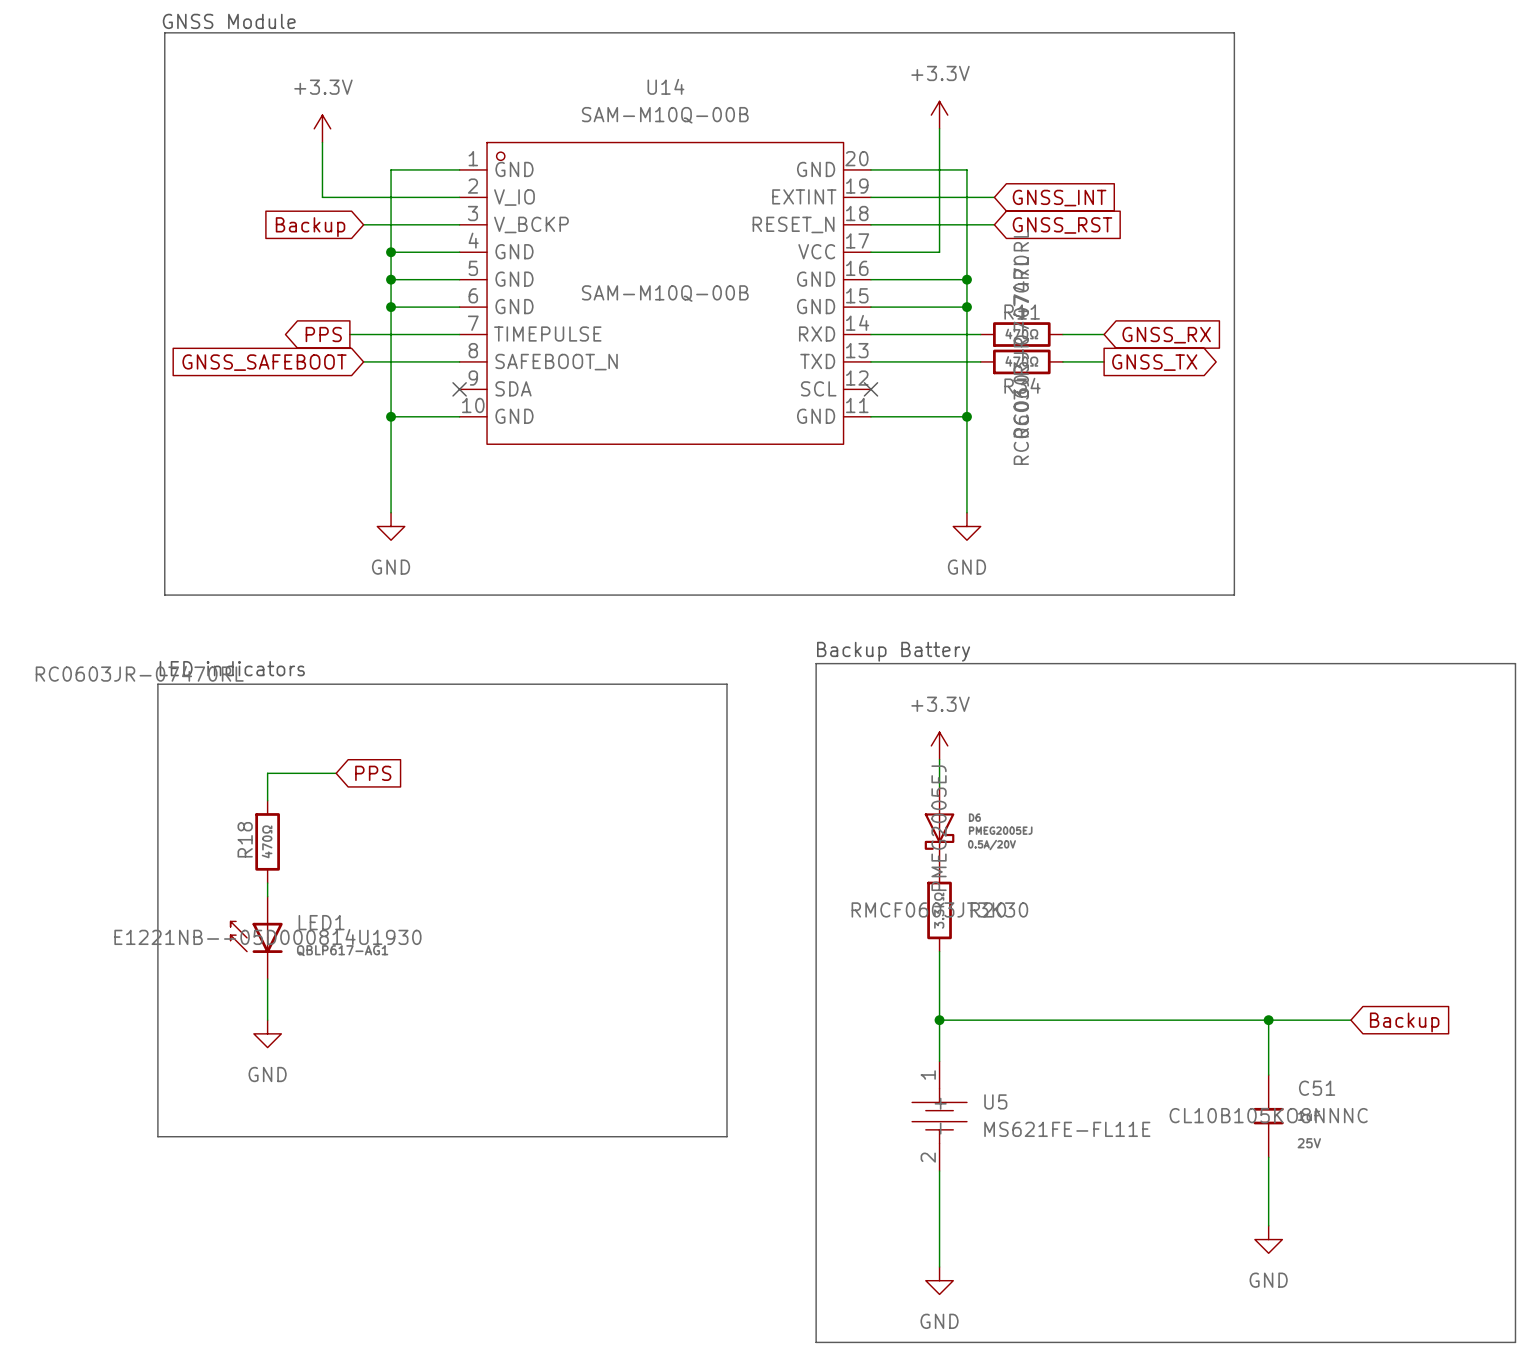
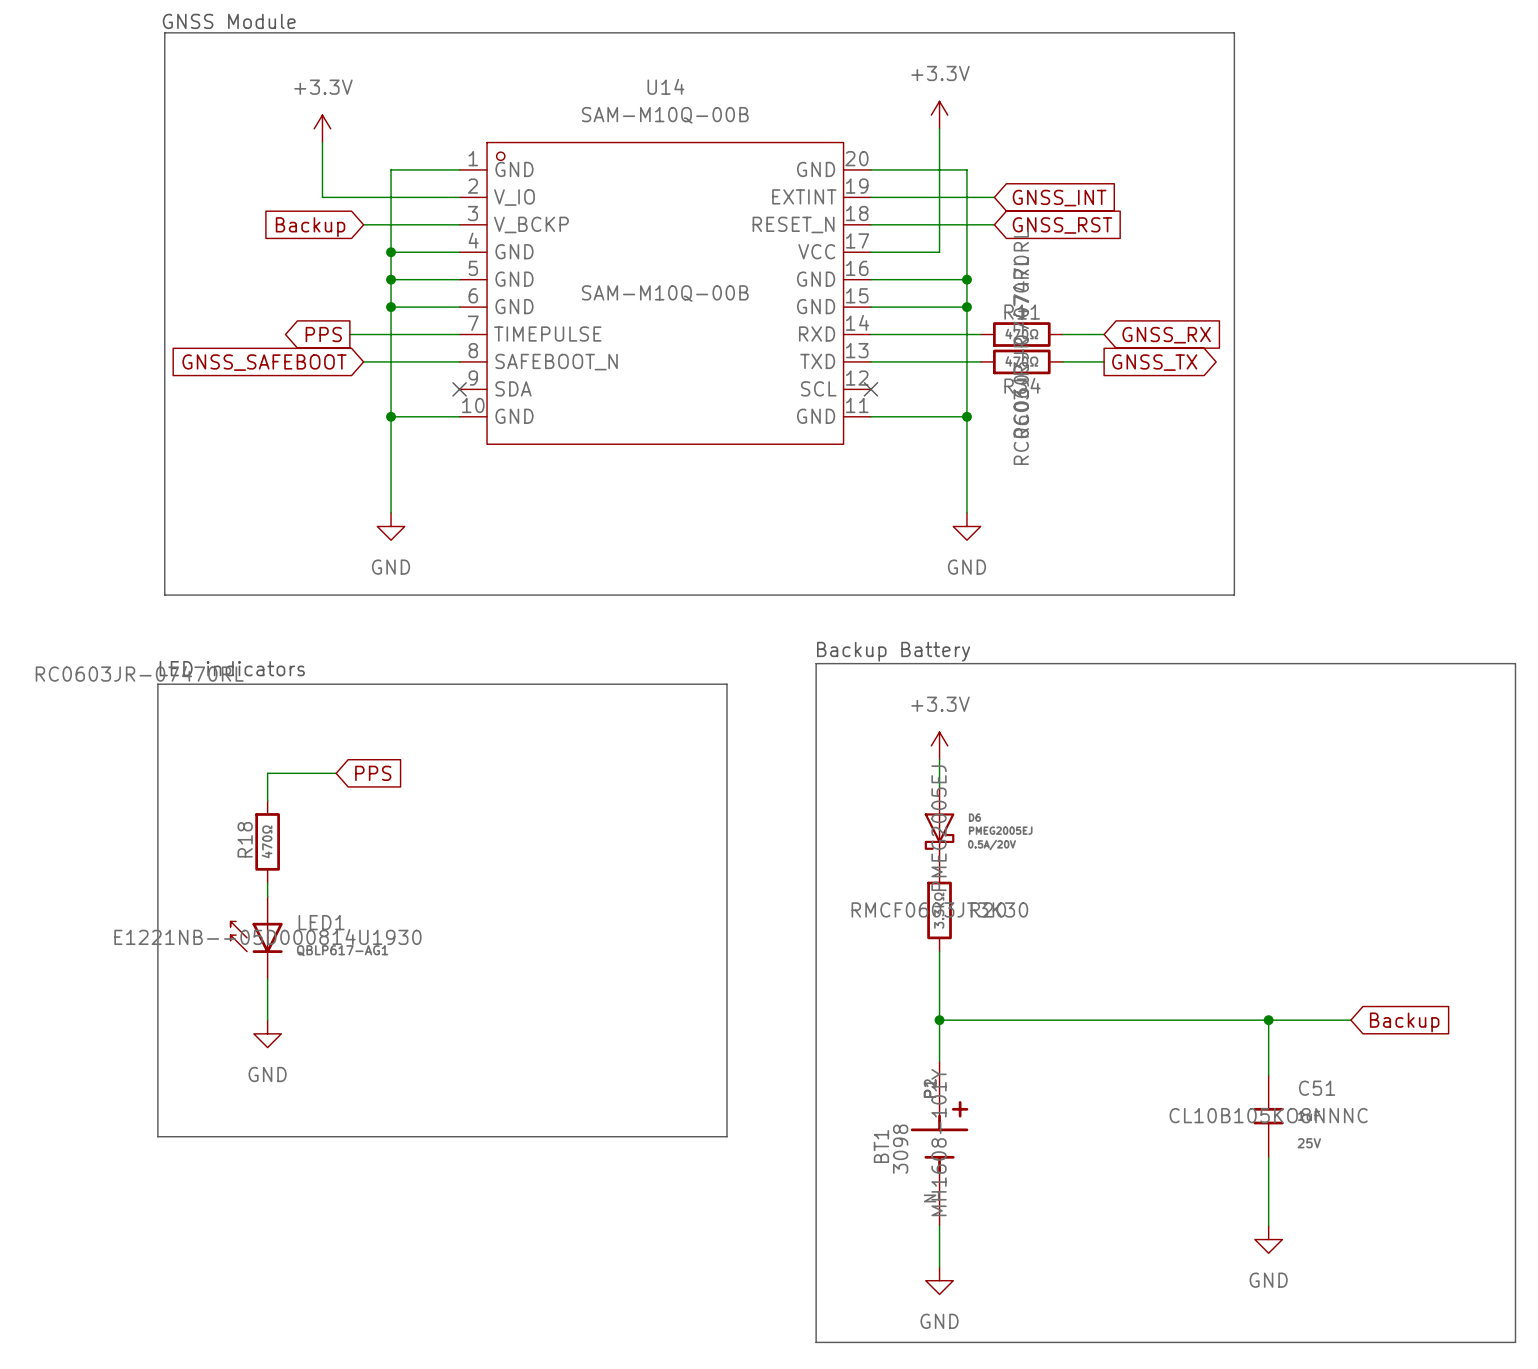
U5: MS621FE-FL11E (939, 1116) -> none
BT1: none -> 3098 (939, 1143)

